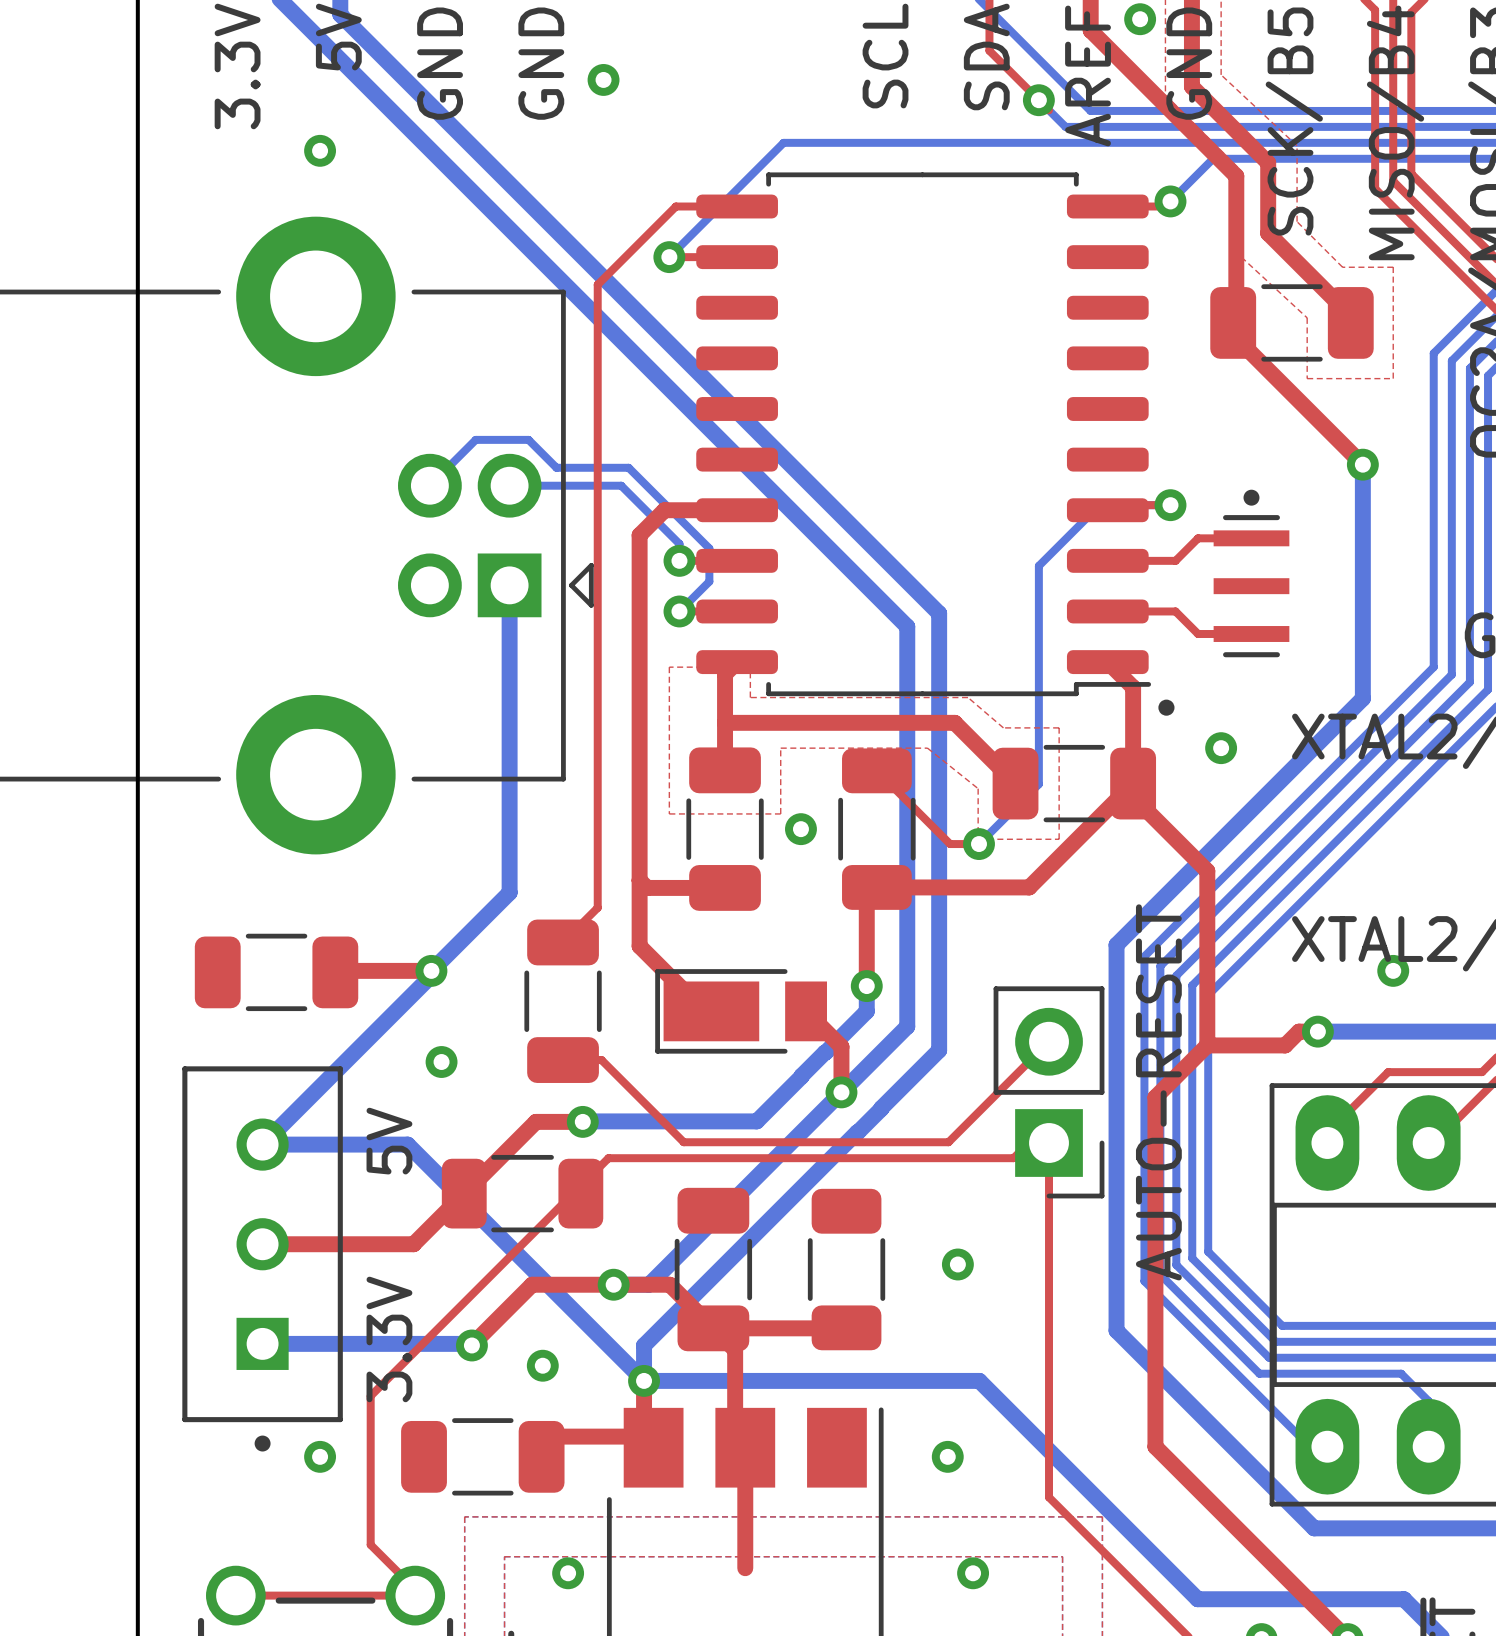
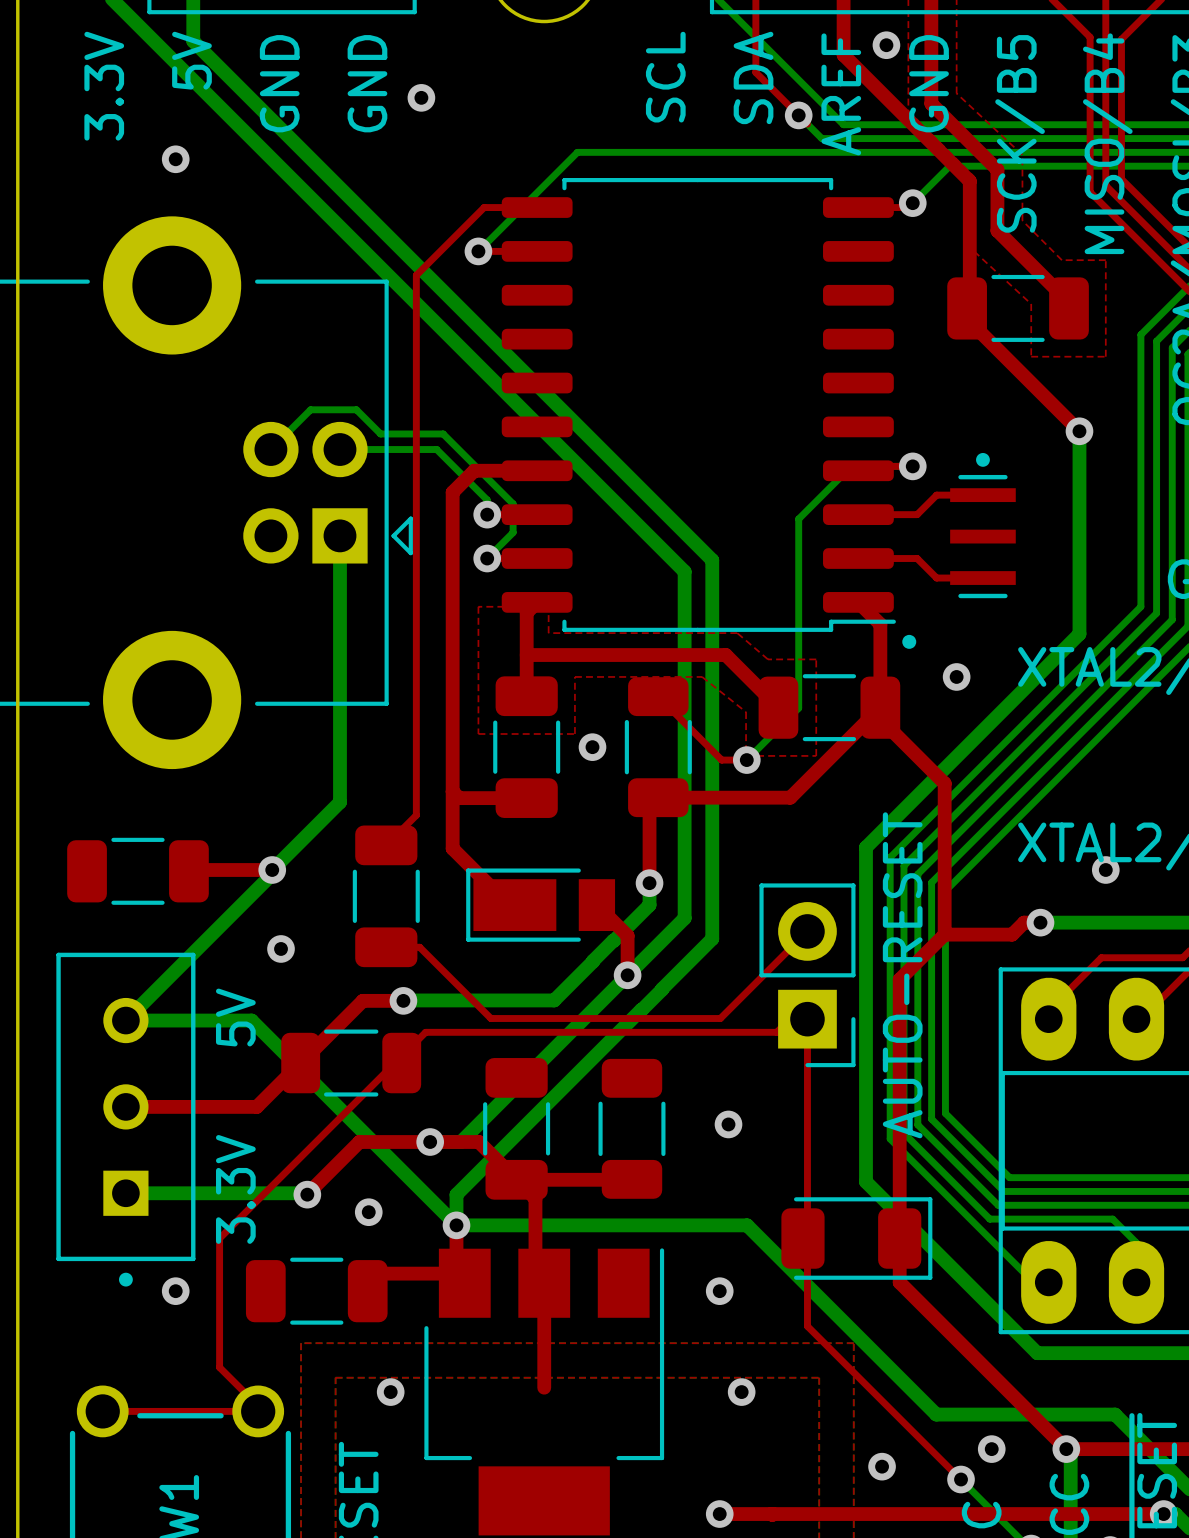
part: none -> (856, 1238)

